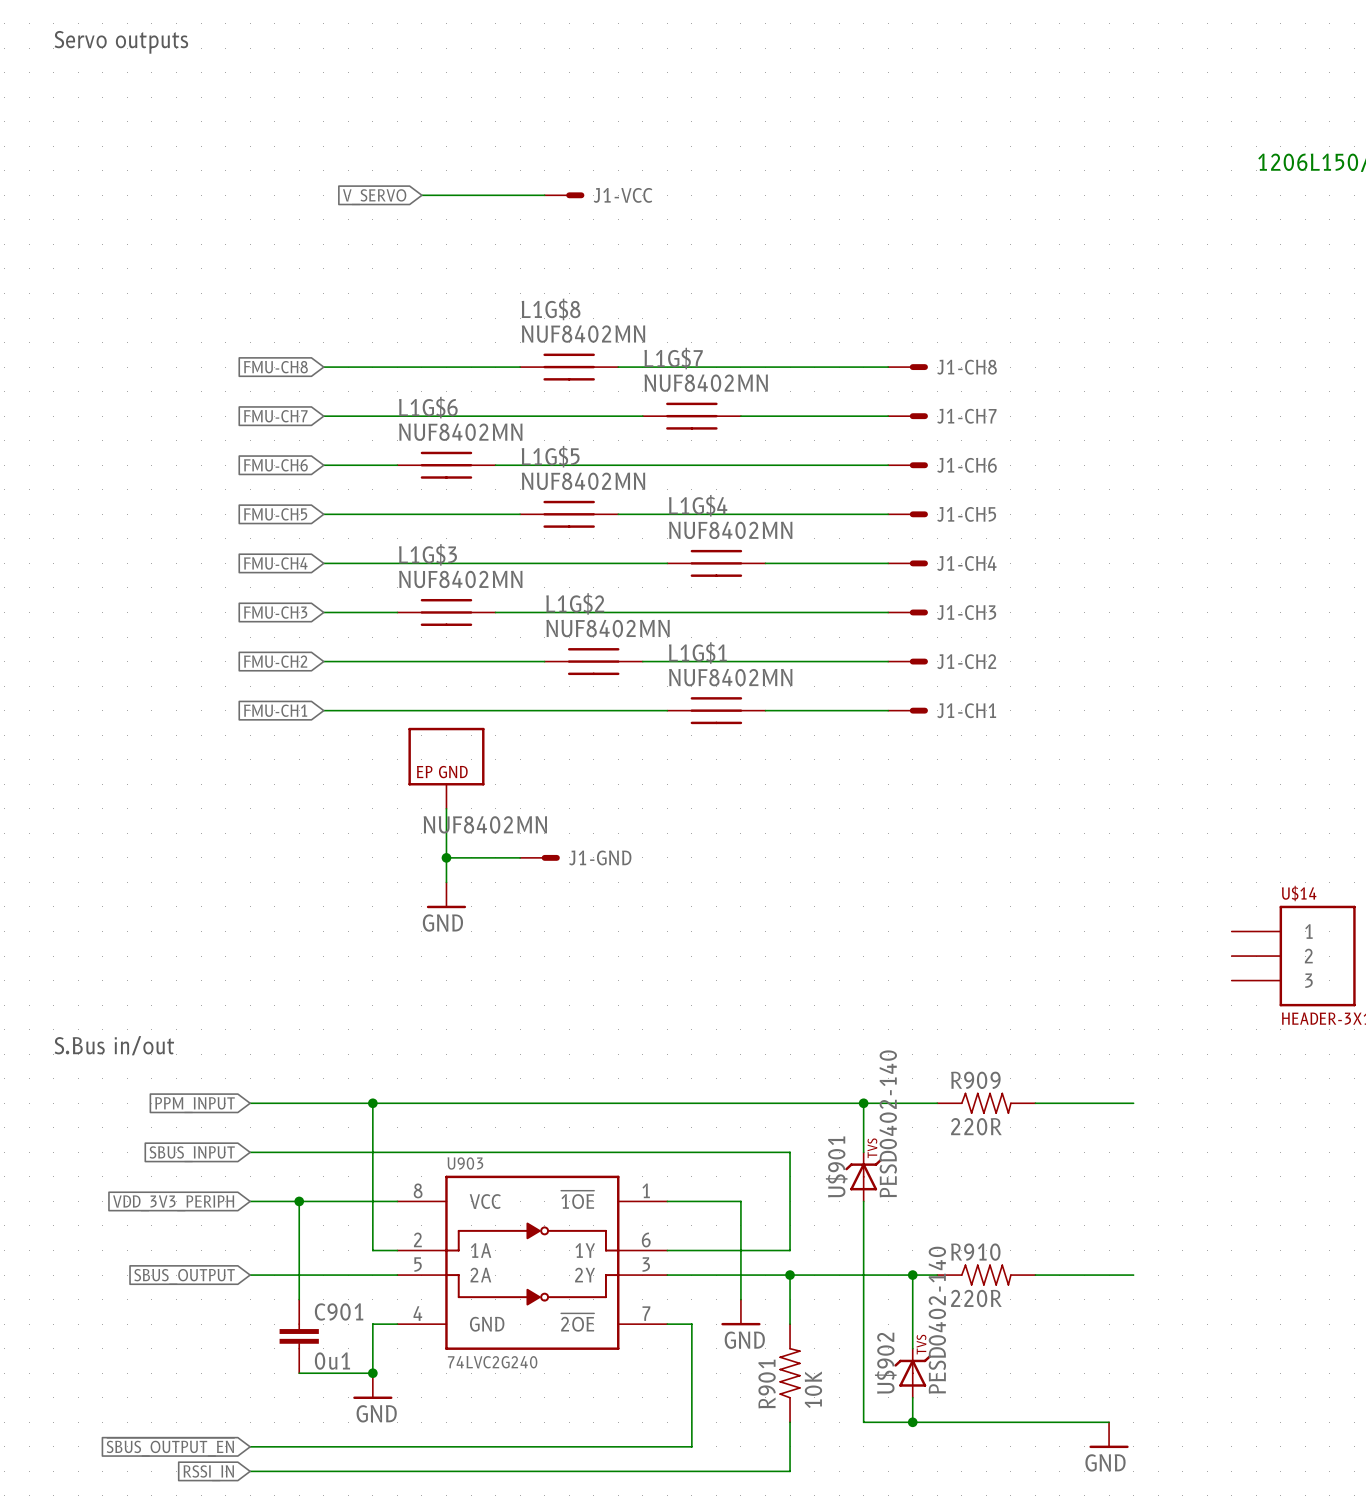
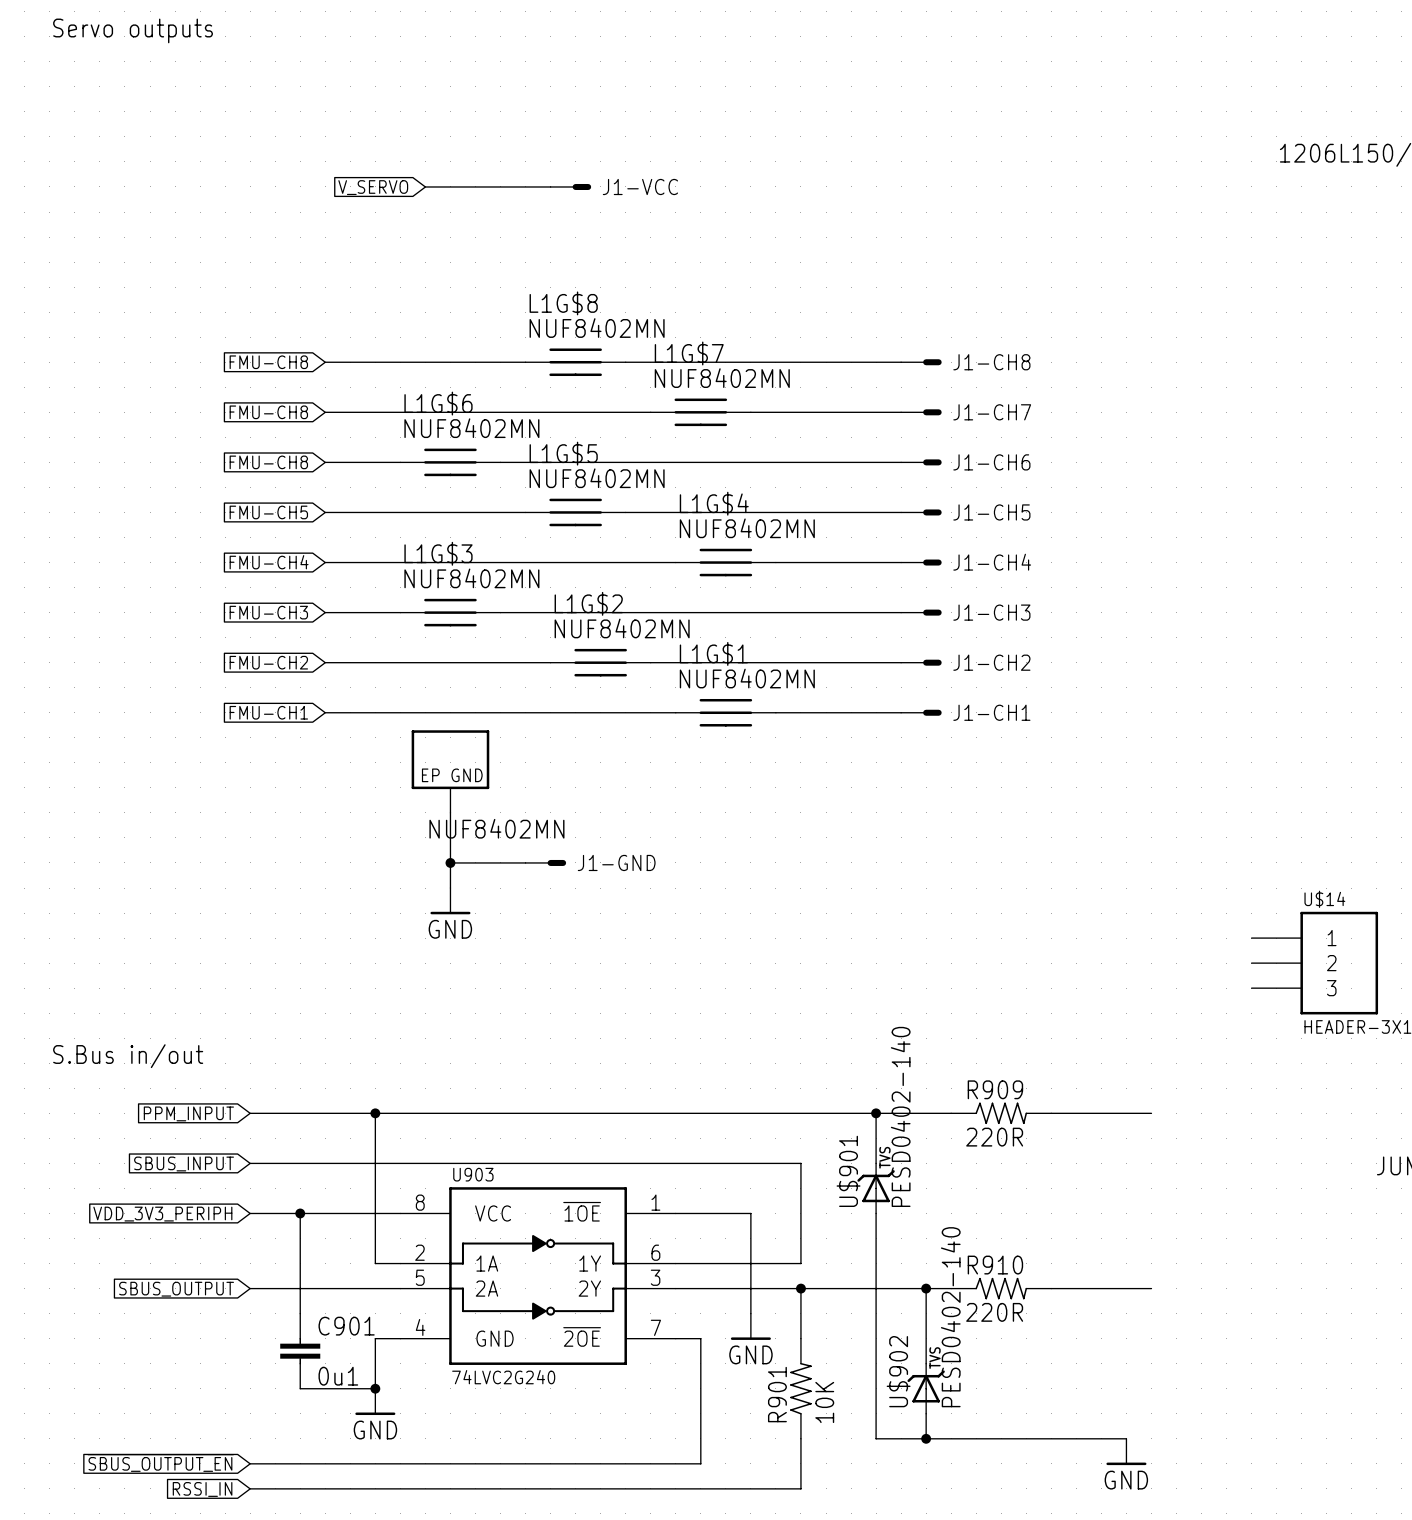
global label: FMU-CH7 (275, 416) -> FMU-CH8 (268, 412)
global label: FMU-CH6 (275, 465) -> FMU-CH8 (268, 462)

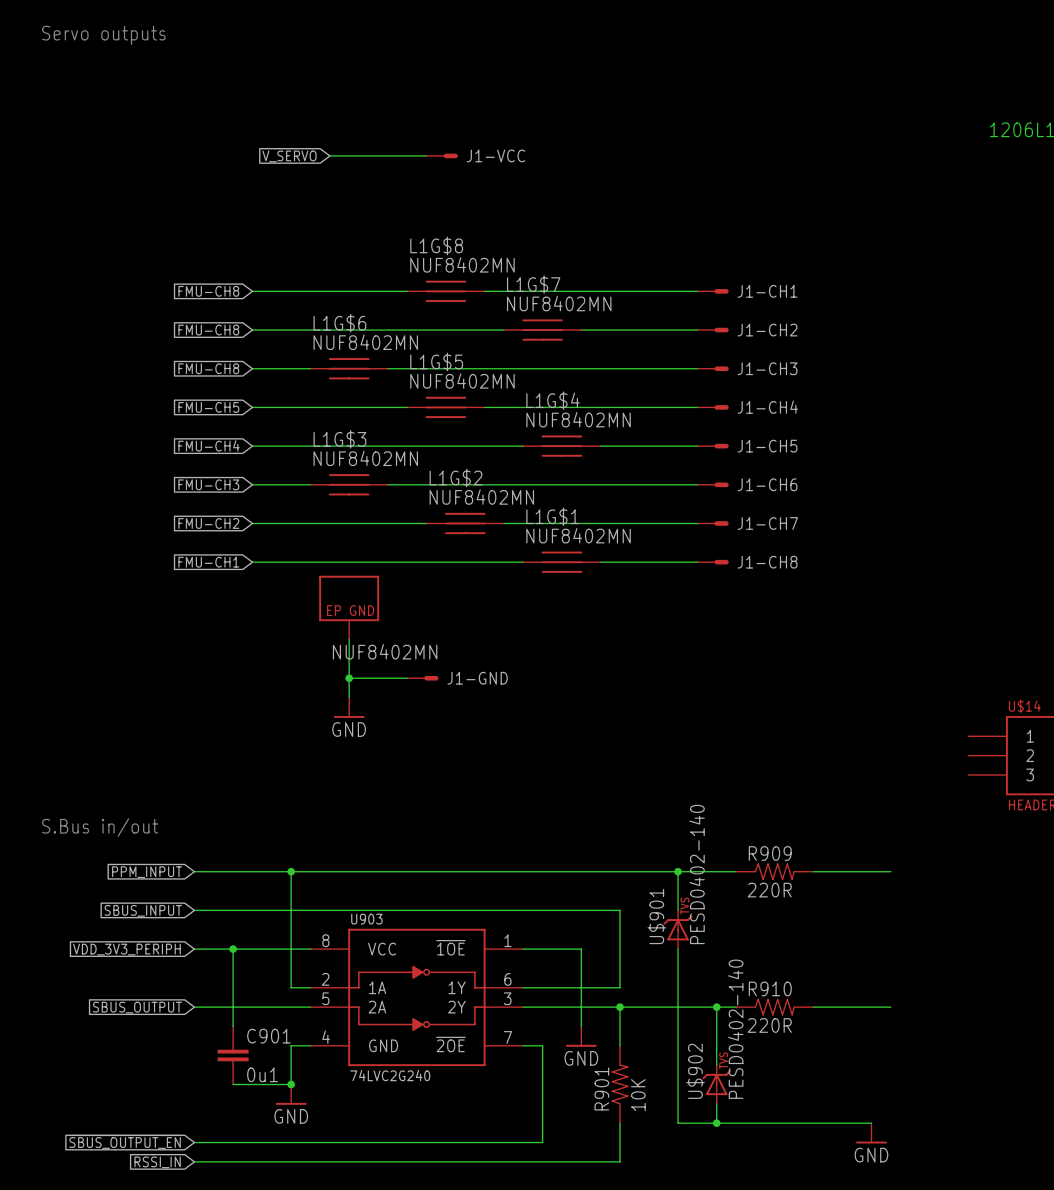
J1-CH8 name: J1-CH8 (991, 362) -> J1-CH1 (767, 291)
J1-CH7 name: J1-CH7 (992, 412) -> J1-CH2 (767, 330)
J1-CH6 name: J1-CH6 (991, 462) -> J1-CH3 (767, 368)
J1-CH5 name: J1-CH5 (991, 512) -> J1-CH4 (767, 407)
J1-CH4 name: J1-CH4 (992, 562) -> J1-CH5 (767, 446)
J1-CH3 name: J1-CH3 (991, 612) -> J1-CH6 (767, 484)
J1-CH2 name: J1-CH2 (991, 662) -> J1-CH7 (767, 523)
J1-CH1 name: J1-CH1 (991, 712) -> J1-CH8 (767, 562)

